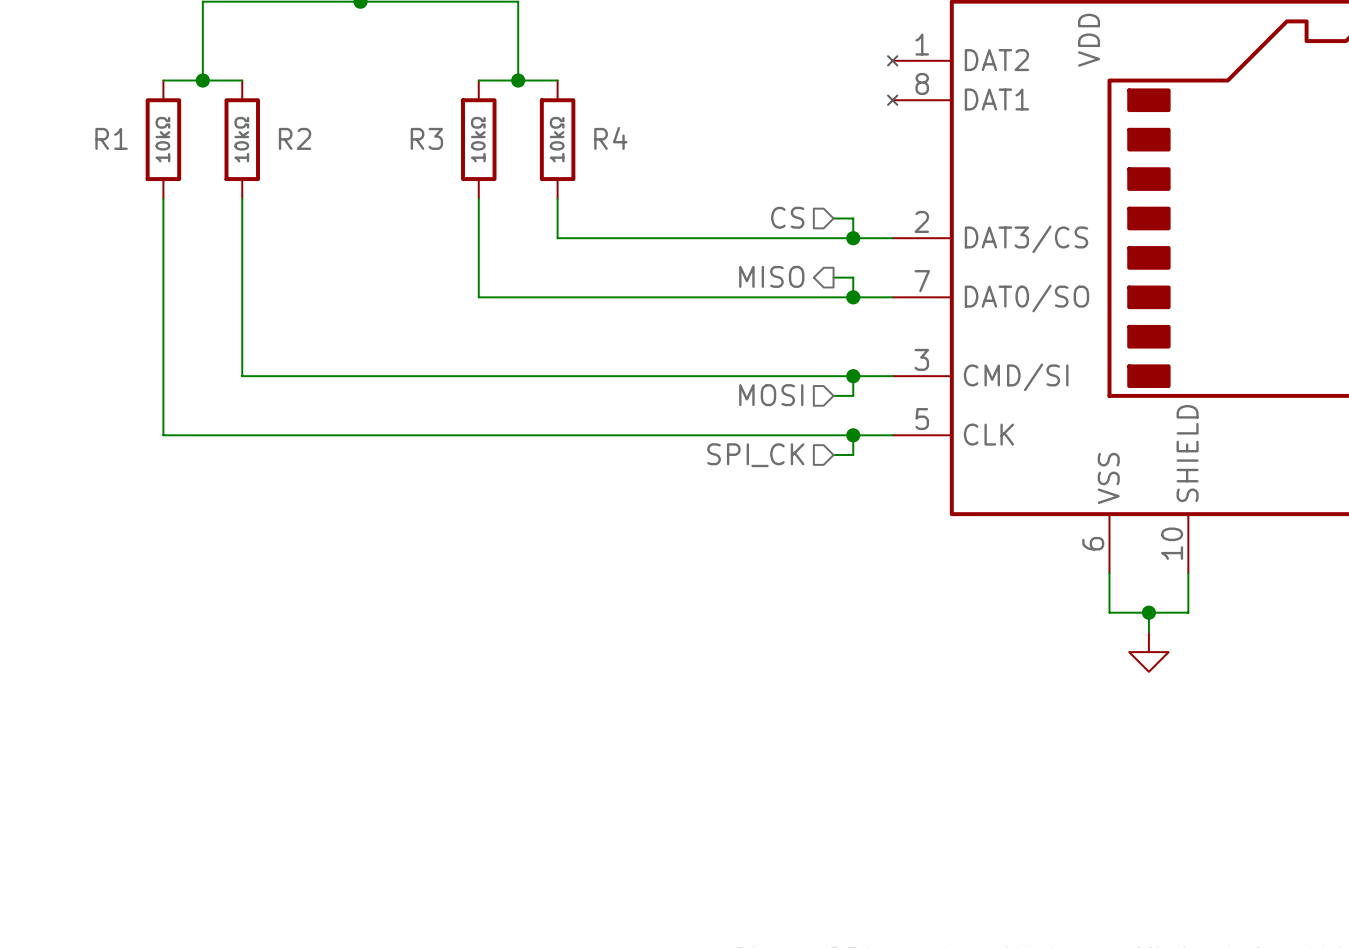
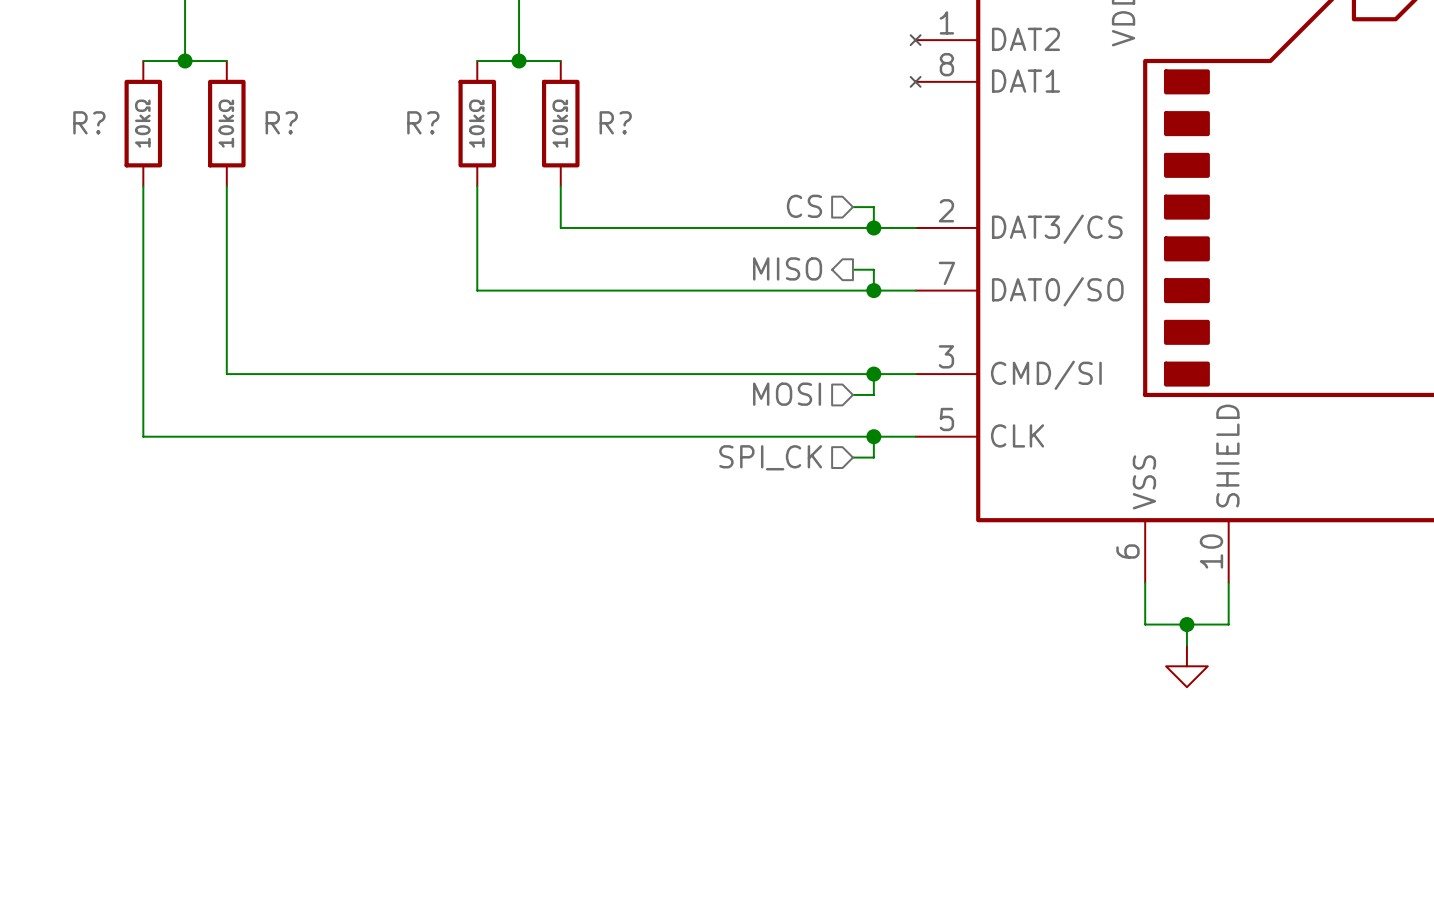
R1 name: R1 (111, 138) -> R? (89, 122)
R2 name: R2 (295, 138) -> R? (281, 122)
R3 name: R3 (426, 138) -> R? (423, 122)
R4 name: R4 (610, 138) -> R? (615, 122)

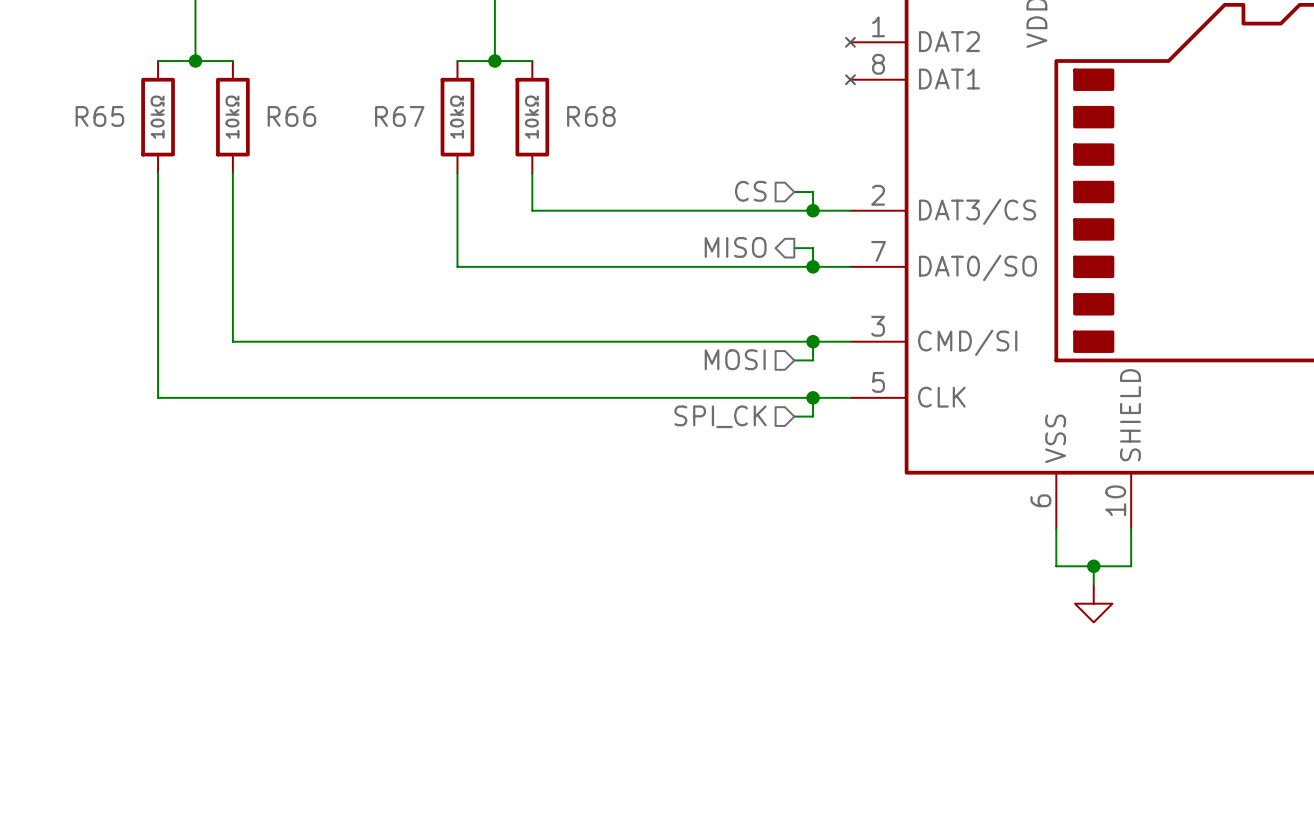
R? name: R? (89, 122) -> R65 (99, 116)
R? name: R? (281, 122) -> R66 (291, 116)
R? name: R? (423, 122) -> R67 (399, 116)
R? name: R? (615, 122) -> R68 (591, 116)

